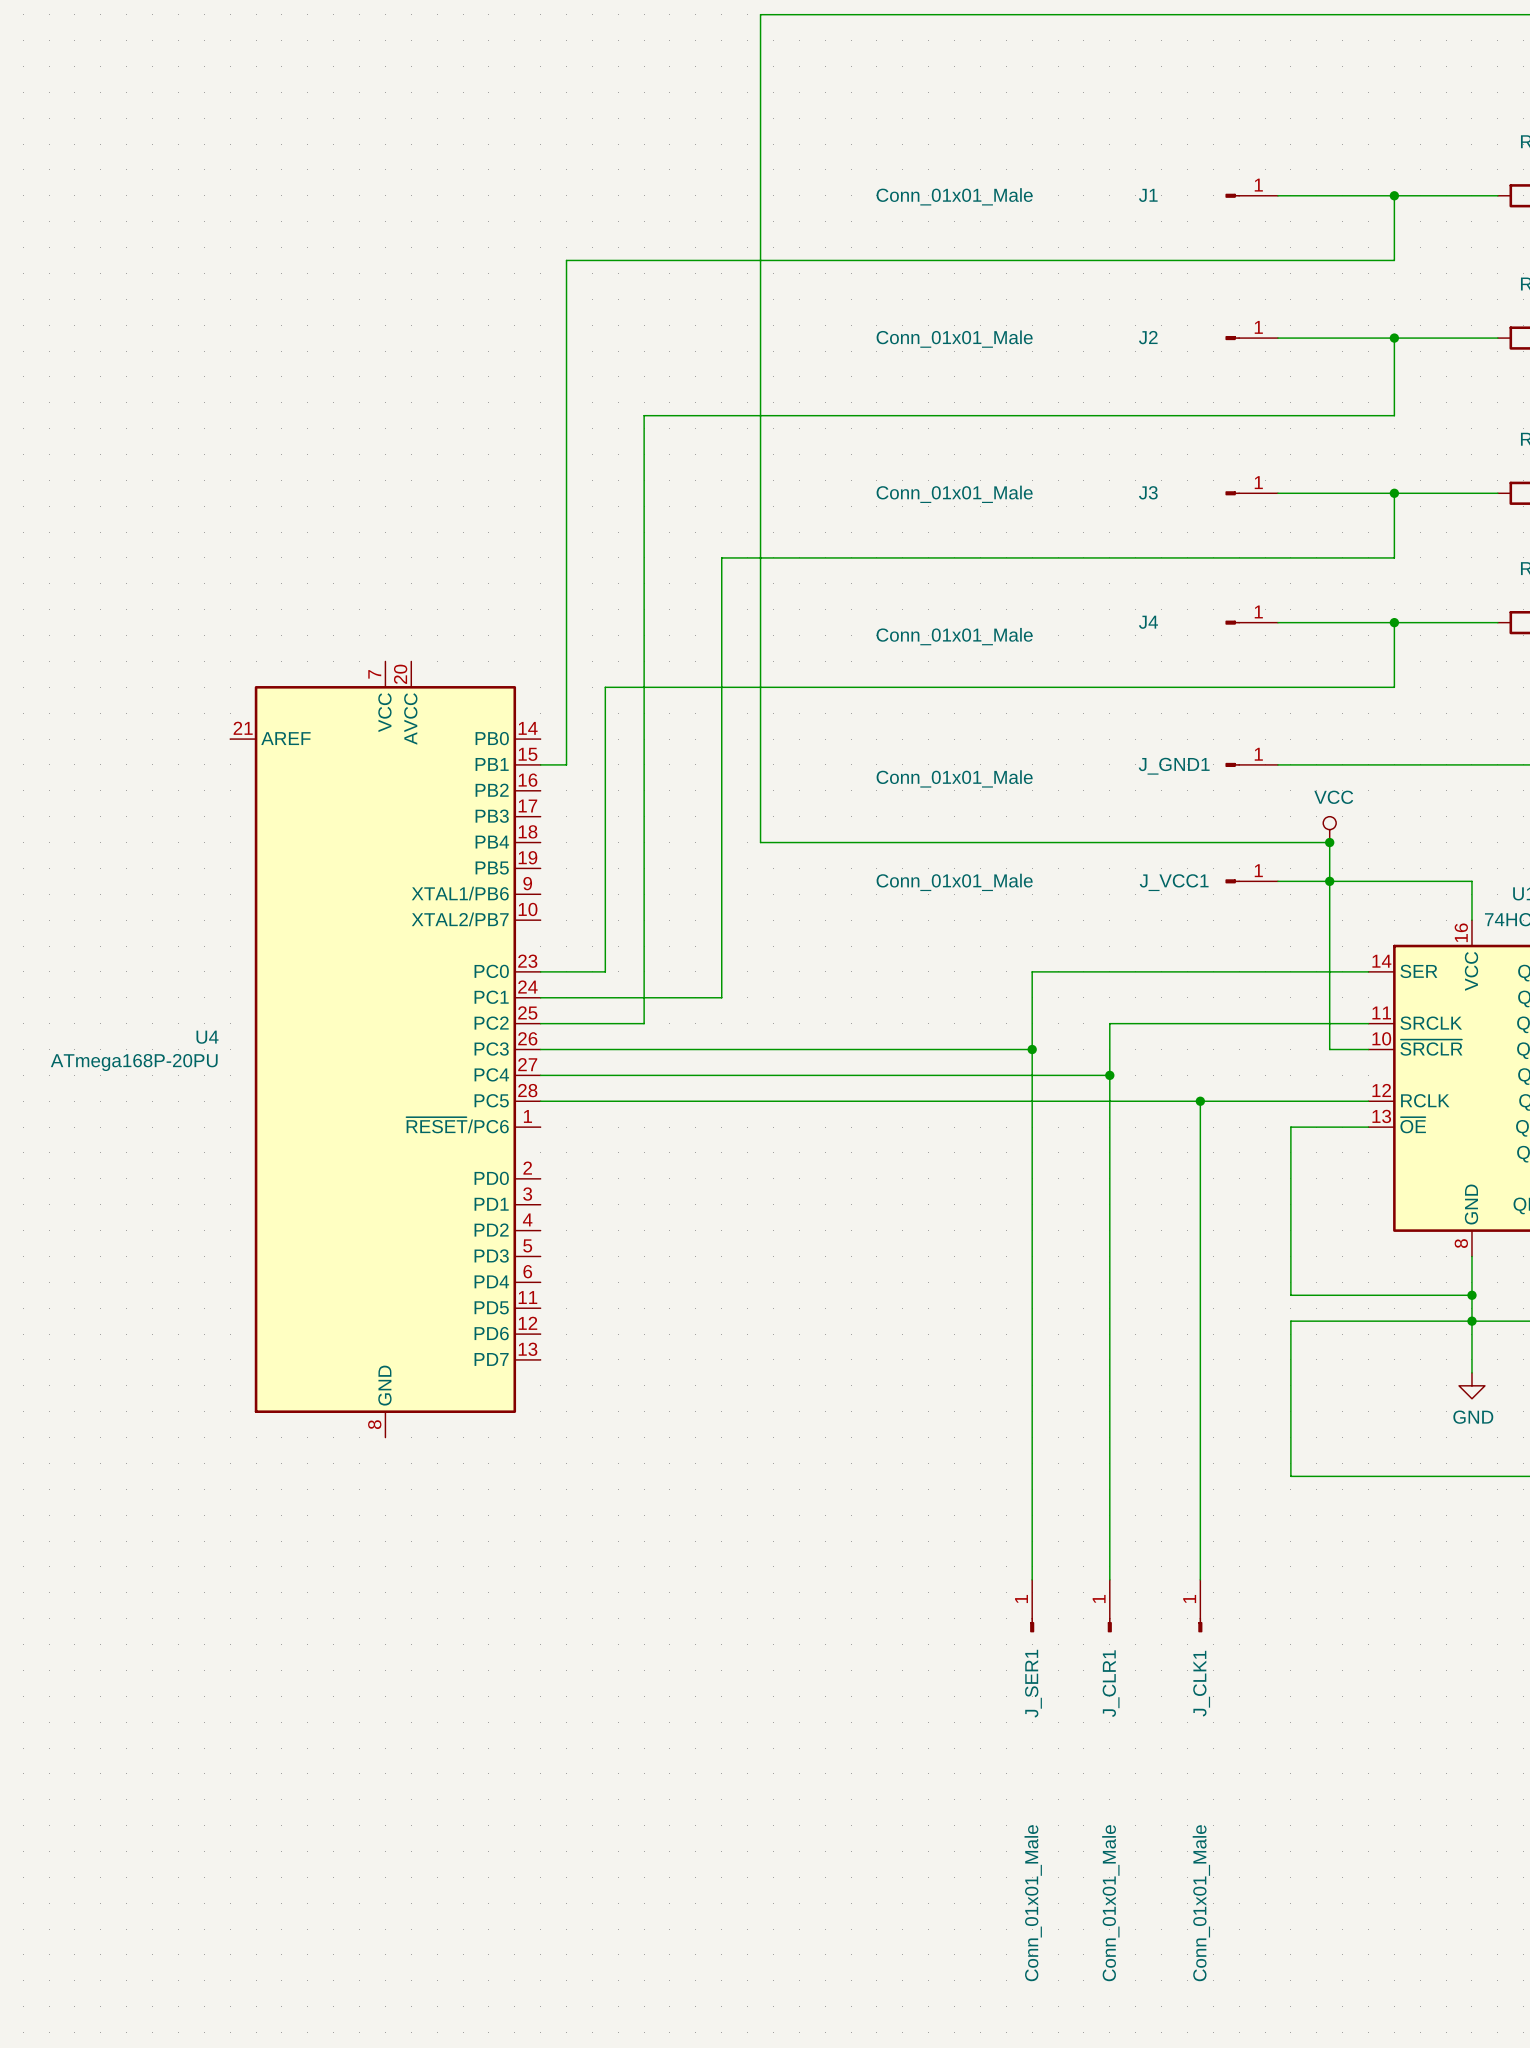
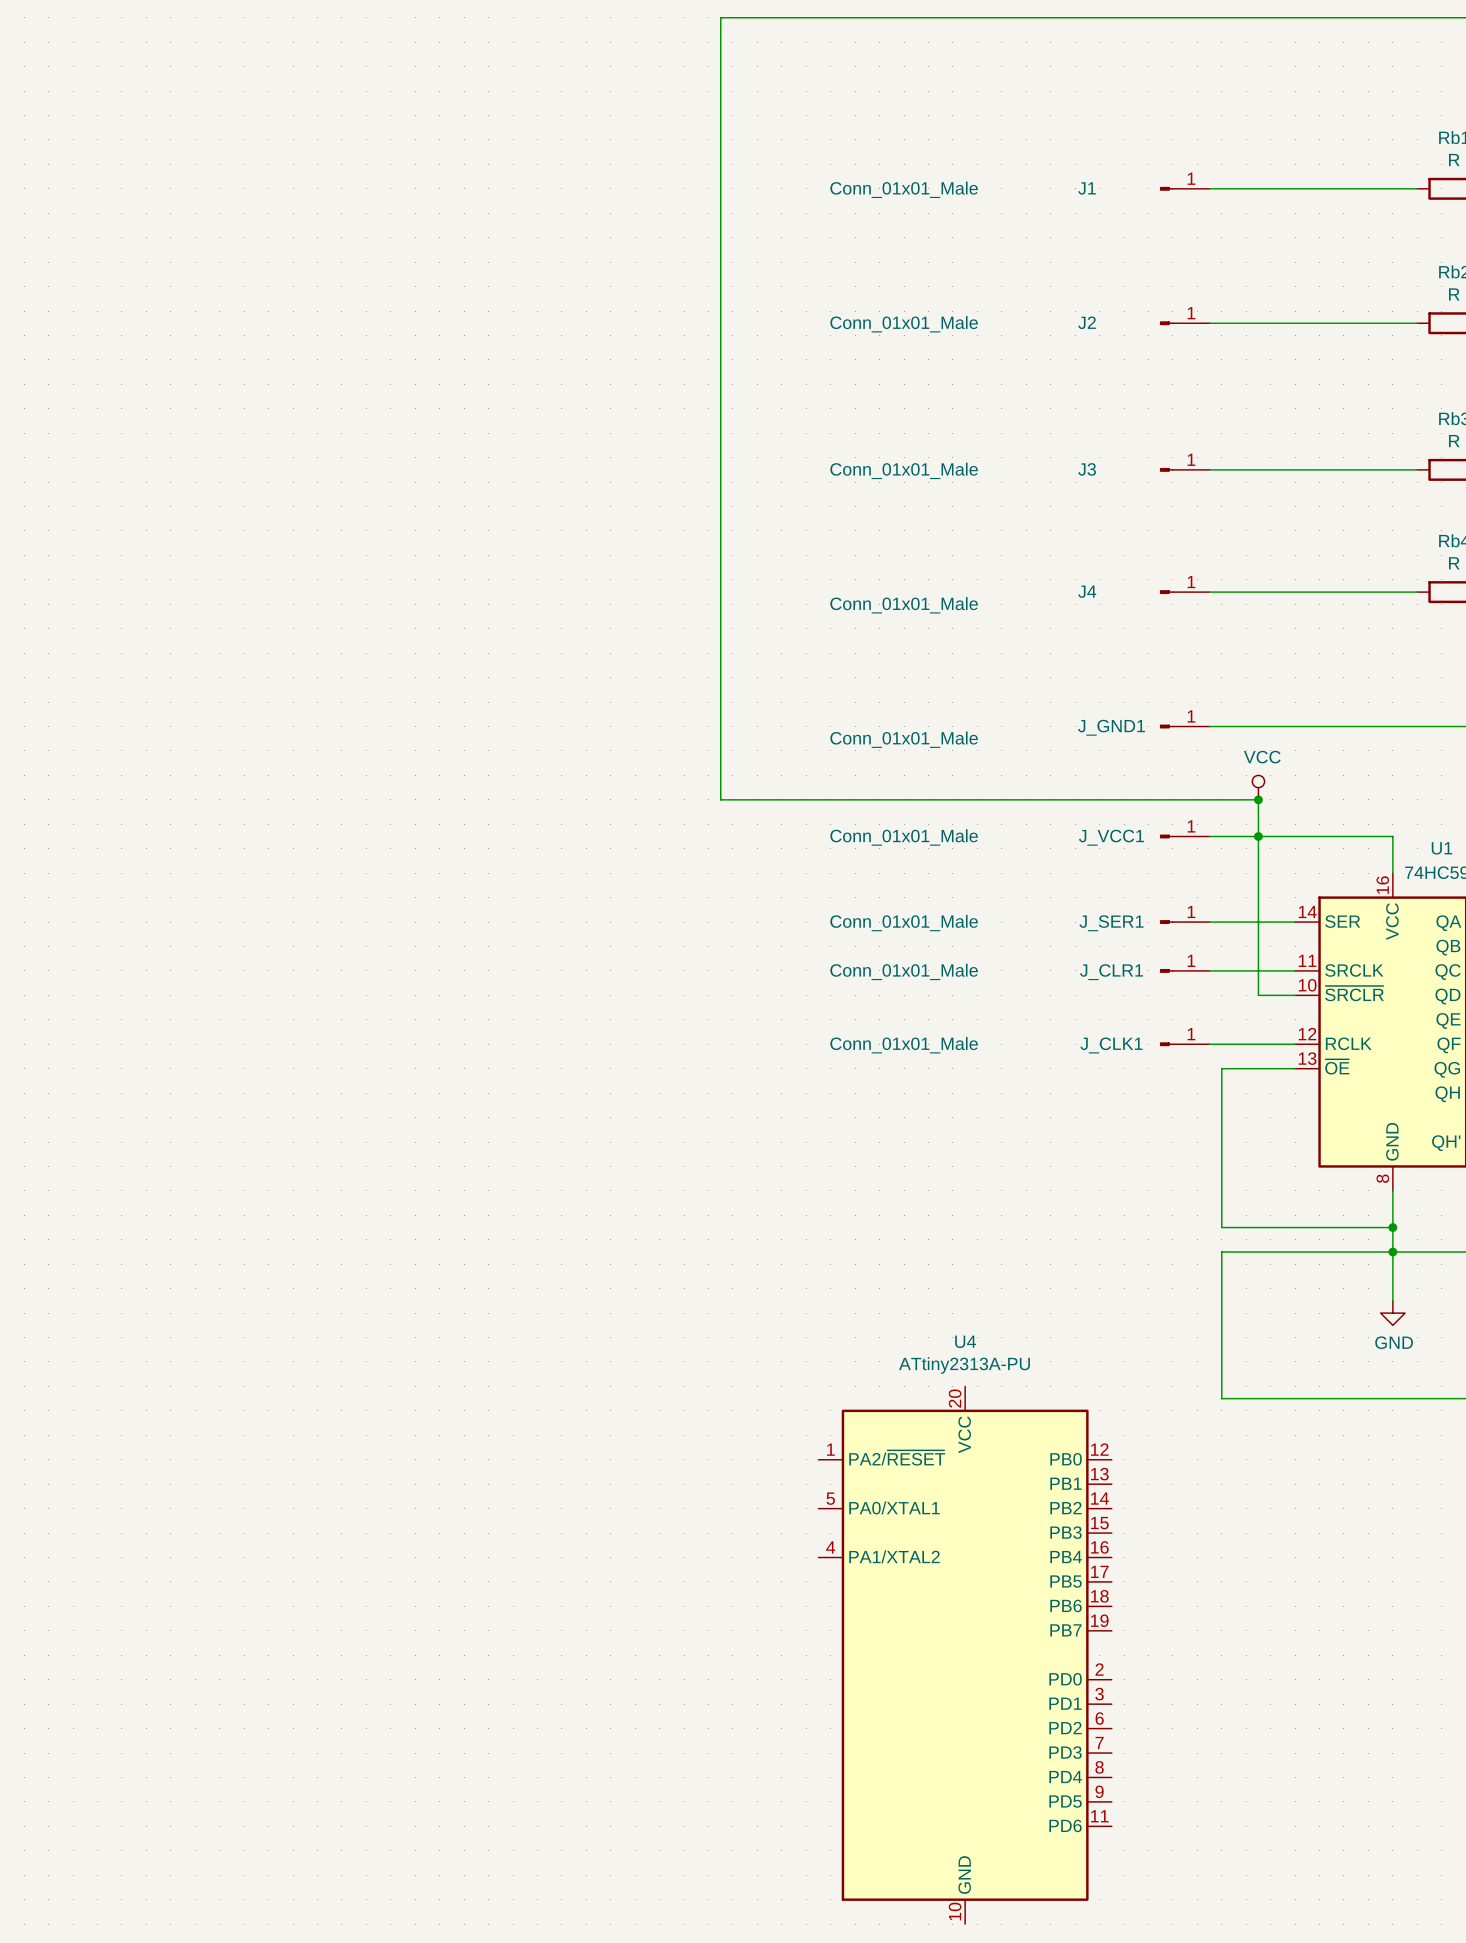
wire: (1394, 195) (1394, 260) (566, 260) (566, 764) (540, 764) -> none
junction: (1394, 195) -> none
wire: (1394, 338) (1394, 415) (644, 415) (644, 1023) (540, 1023) -> none
junction: (1394, 338) -> none
wire: (1394, 493) (1394, 557) (721, 557) (721, 997) (540, 997) -> none
junction: (1394, 493) -> none
wire: (1394, 622) (1394, 687) (605, 687) (605, 971) (540, 971) -> none
junction: (1394, 622) -> none
U4 symbol: [230, 661, 541, 1438] -> [818, 1386, 1112, 1925]
wire: (1277, 971) (1032, 971) (1032, 1579) -> none
wire: (1277, 1023) (1109, 1023) (1109, 1579) -> none
U4 name position: U4 (207, 1037) -> U4 (965, 1341)
wire: (540, 1049) (1032, 1049) -> none
junction: (1032, 1049) -> none
U4 value: ATmega168P-20PU (134, 1062) -> ATtiny2313A-PU (964, 1365)
wire: (540, 1075) (1109, 1075) -> none
junction: (1109, 1075) -> none
wire: (540, 1101) (1277, 1101) -> none
wire: (1200, 1101) (1200, 1579) -> none
junction: (1200, 1101) -> none
J_SER1 position: (1032, 1606) -> (1184, 922)
J_CLR1 position: (1109, 1606) -> (1184, 970)
J_CLK1 position: (1200, 1606) -> (1184, 1044)
J_SER1 rotation: 0° (1032, 1625) -> 90° clockwise (1166, 922)
J_CLR1 rotation: 0° (1109, 1625) -> 90° clockwise (1166, 970)
J_CLK1 rotation: 0° (1200, 1625) -> 90° clockwise (1166, 1044)

